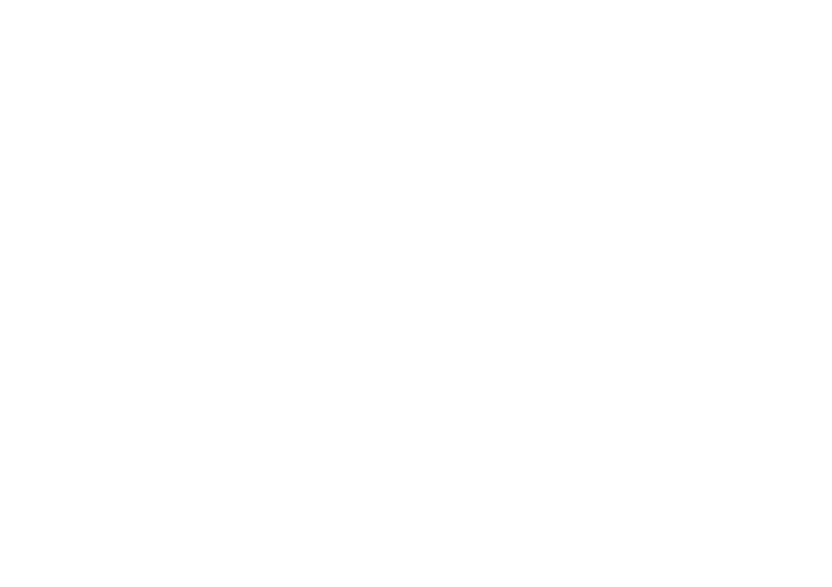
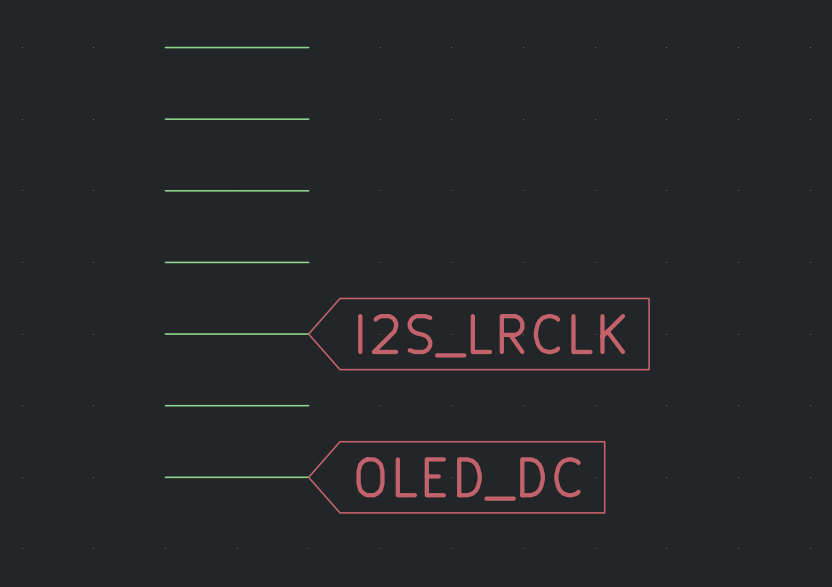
wire: none -> (165, 47) (308, 47)
wire: none -> (165, 119) (308, 119)
wire: none -> (165, 190) (308, 190)
wire: none -> (165, 262) (308, 262)
wire: none -> (165, 334) (308, 334)
global label: none -> I2S_LRCLK (491, 335)
wire: none -> (165, 405) (308, 405)
wire: none -> (165, 477) (308, 477)
global label: none -> OLED_DC (468, 479)

